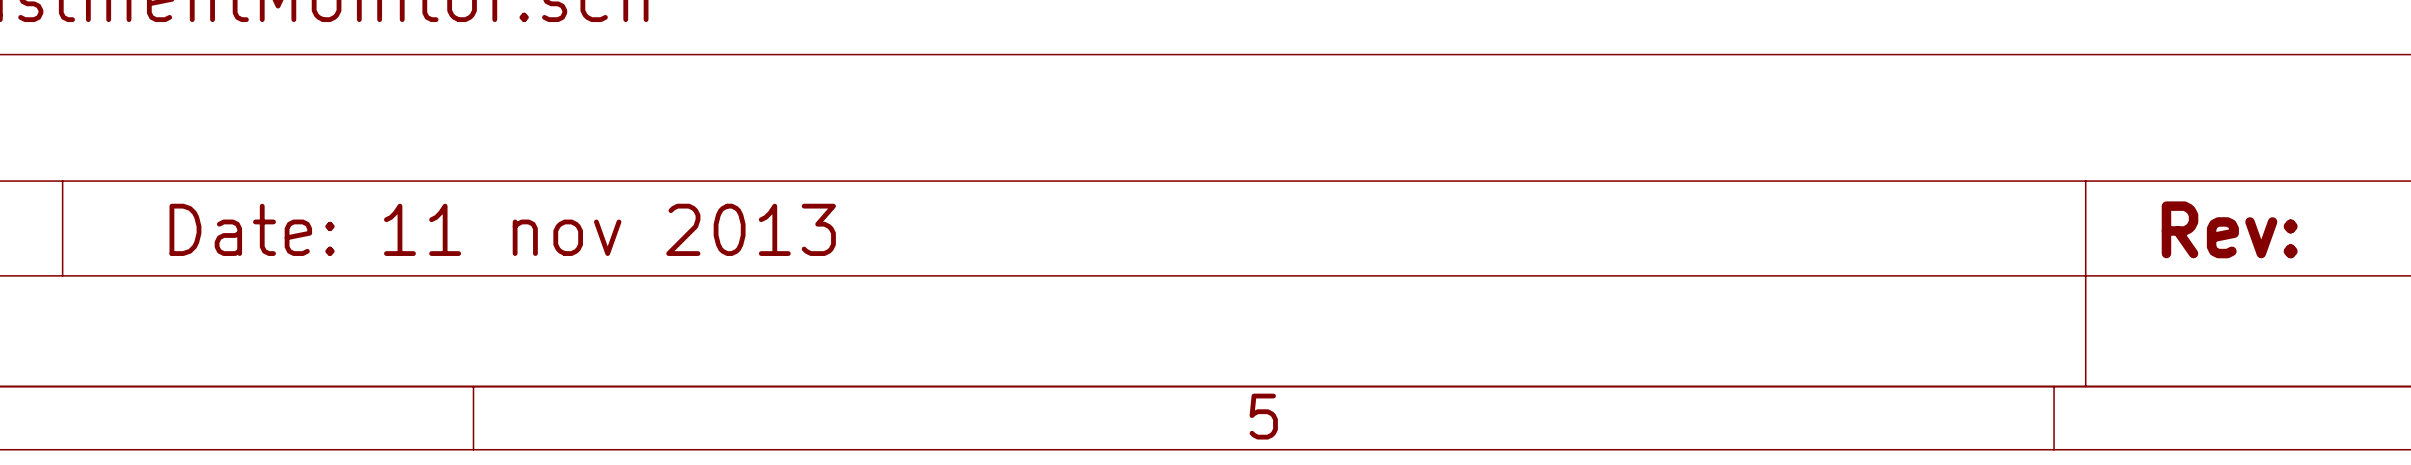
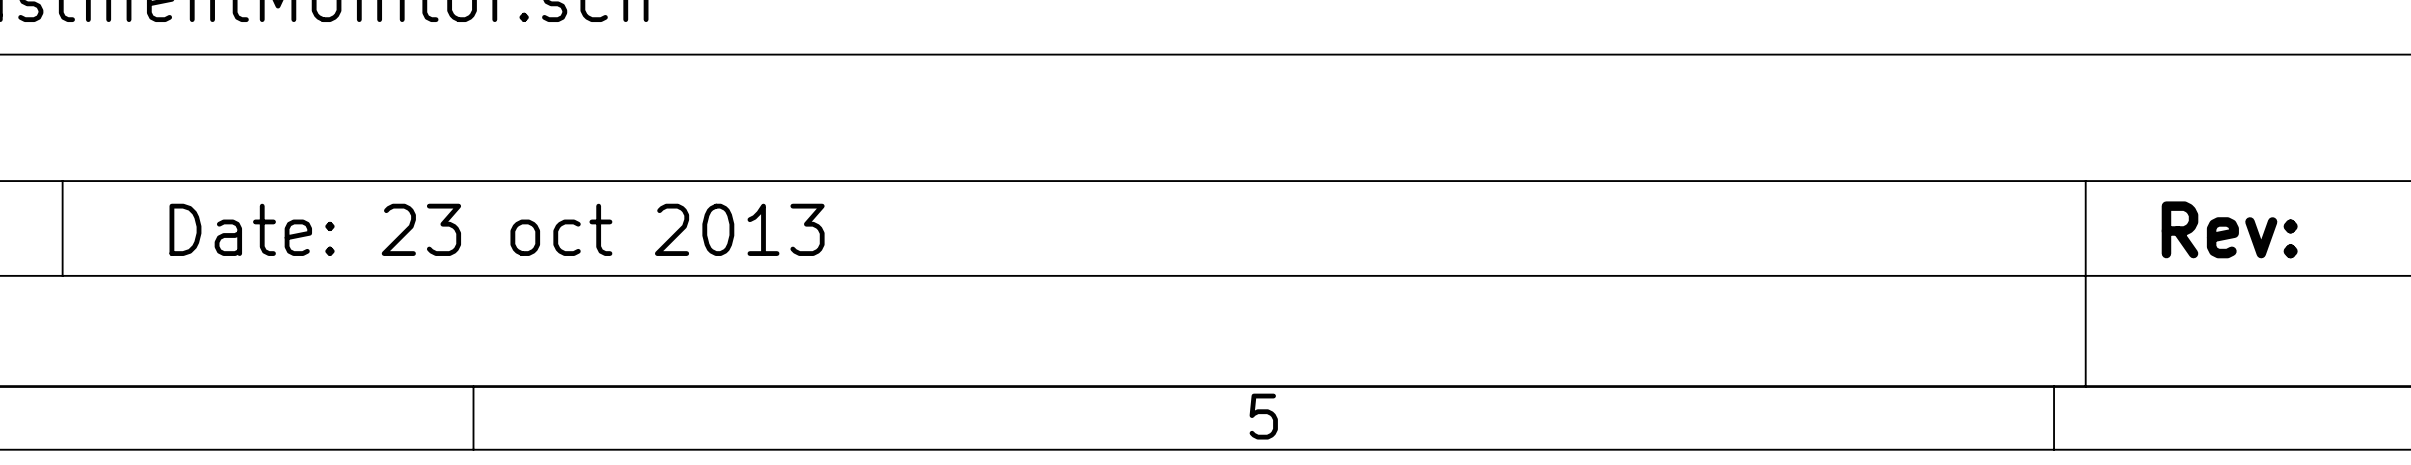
title block: Date: 11 nov 2013 (502, 229) -> Date: 23 oct 2013 (497, 229)

